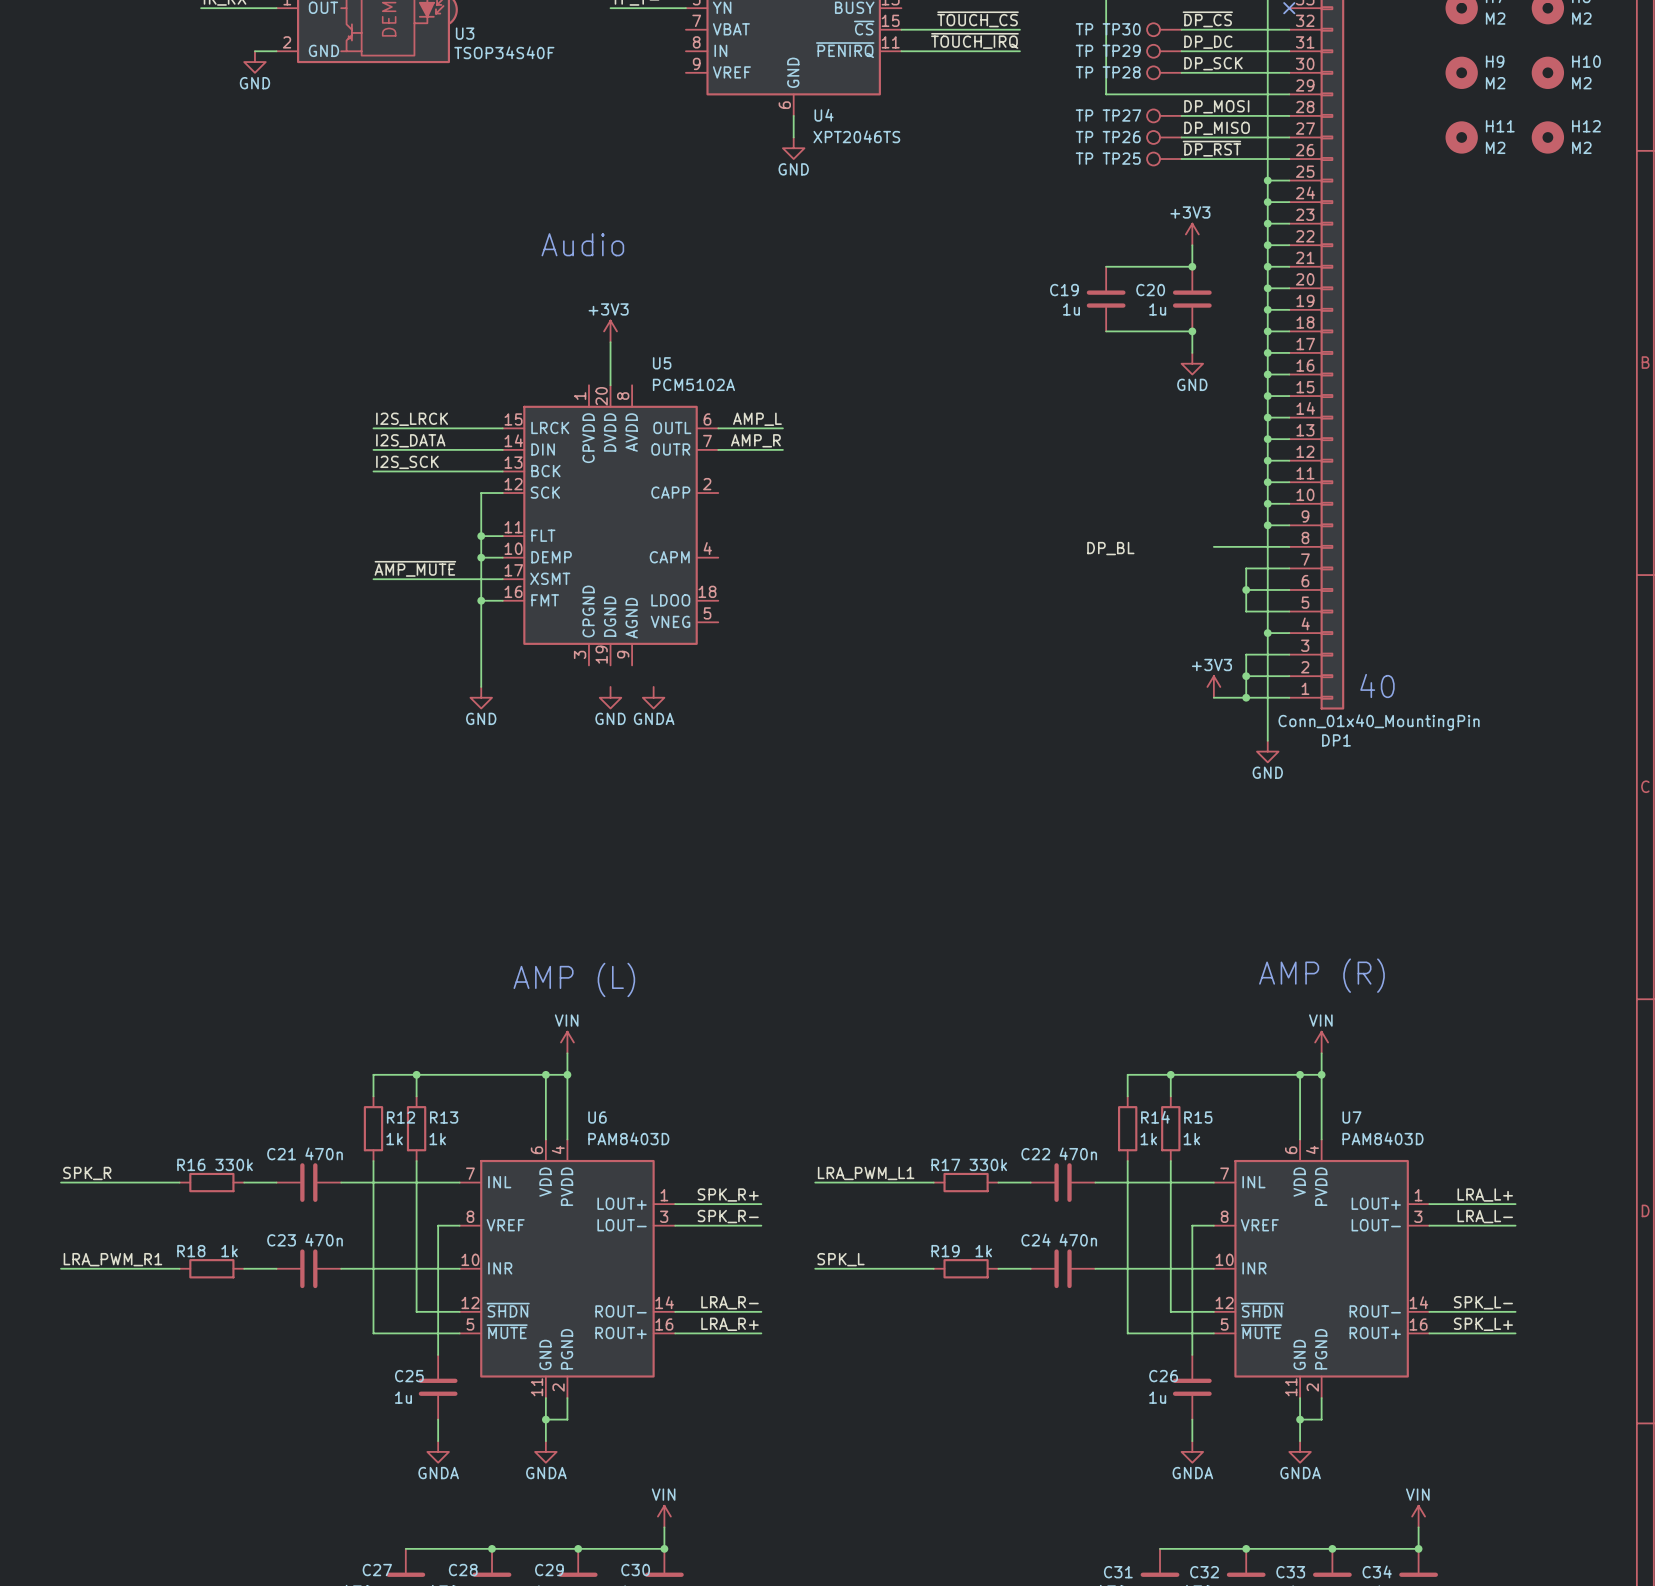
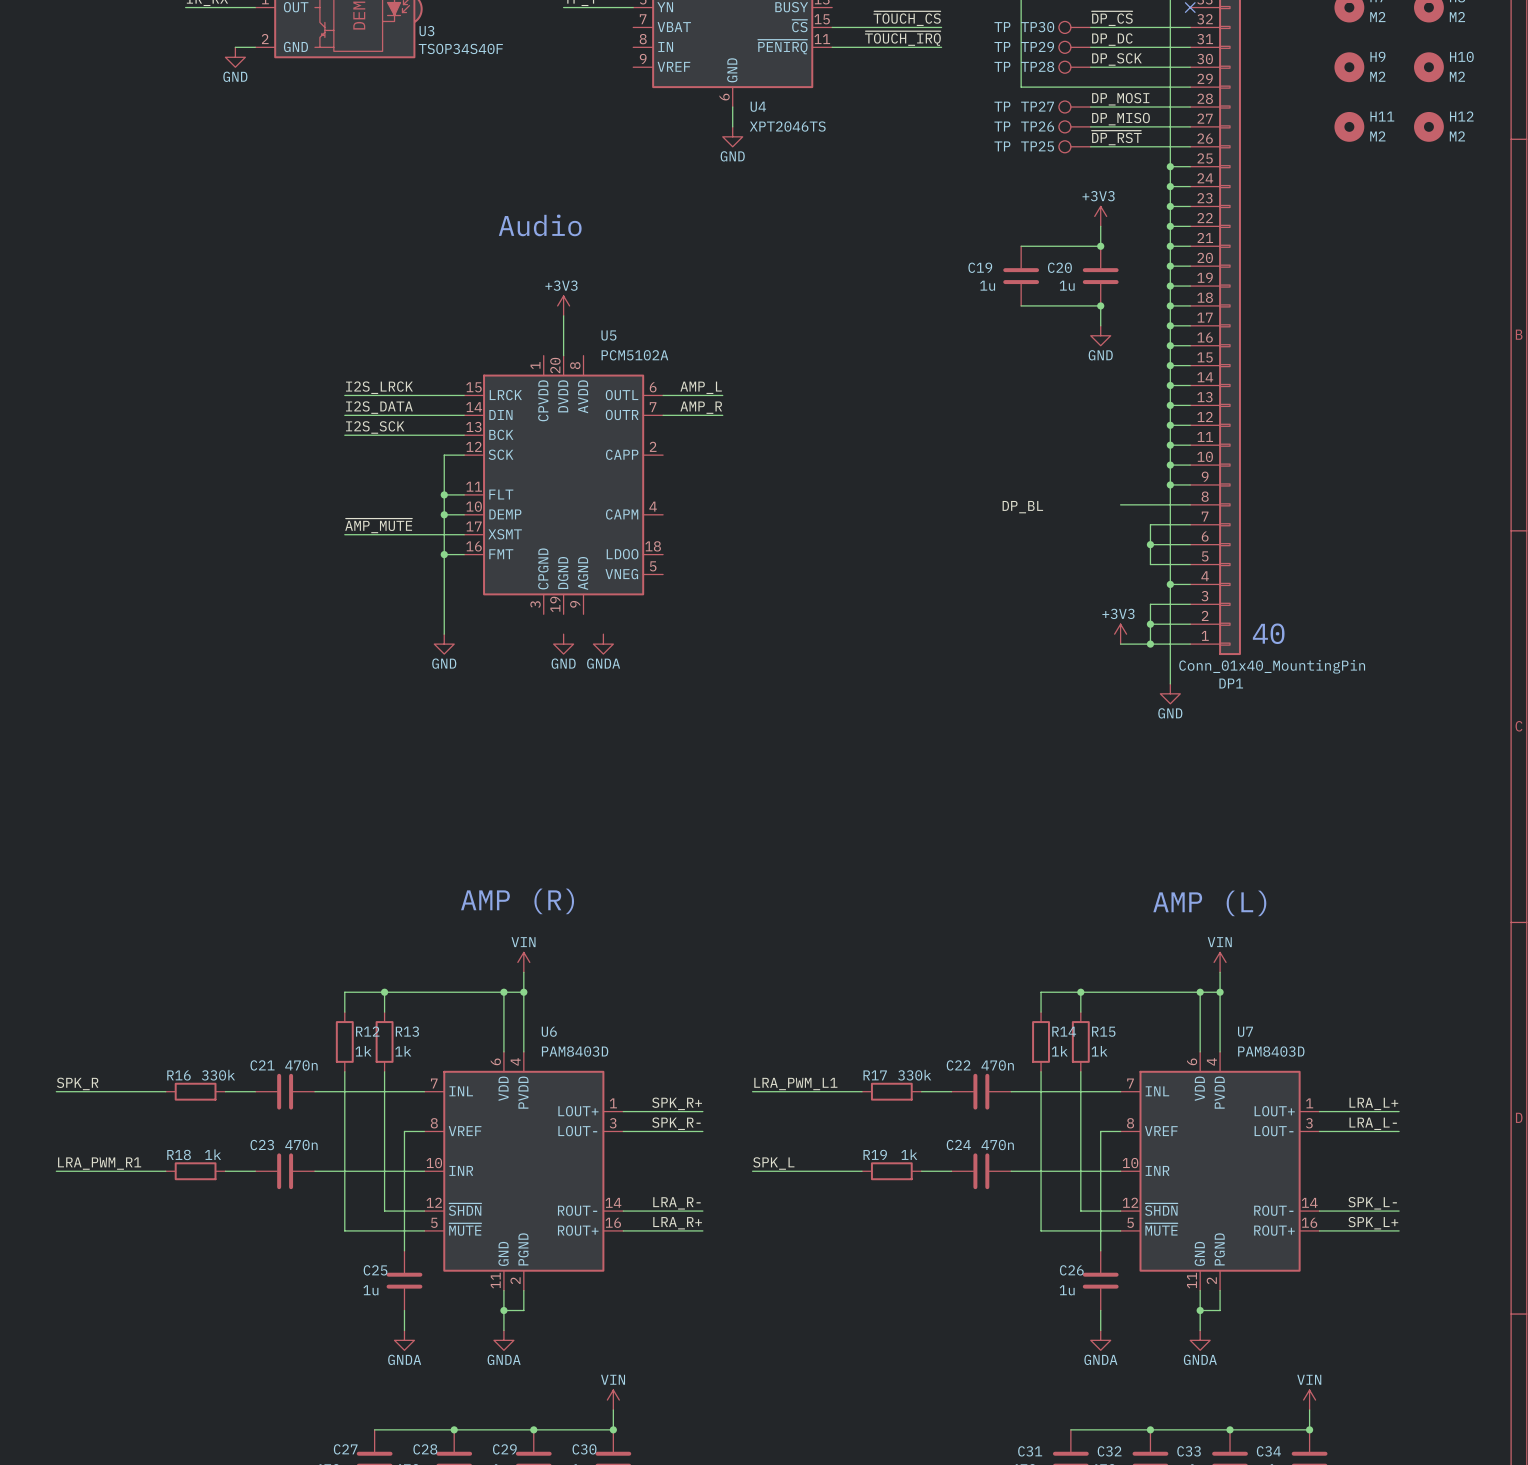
text: AMP (R) (1321, 975) -> AMP (L) (1209, 903)
text: AMP (L) (574, 979) -> AMP (R) (517, 901)

